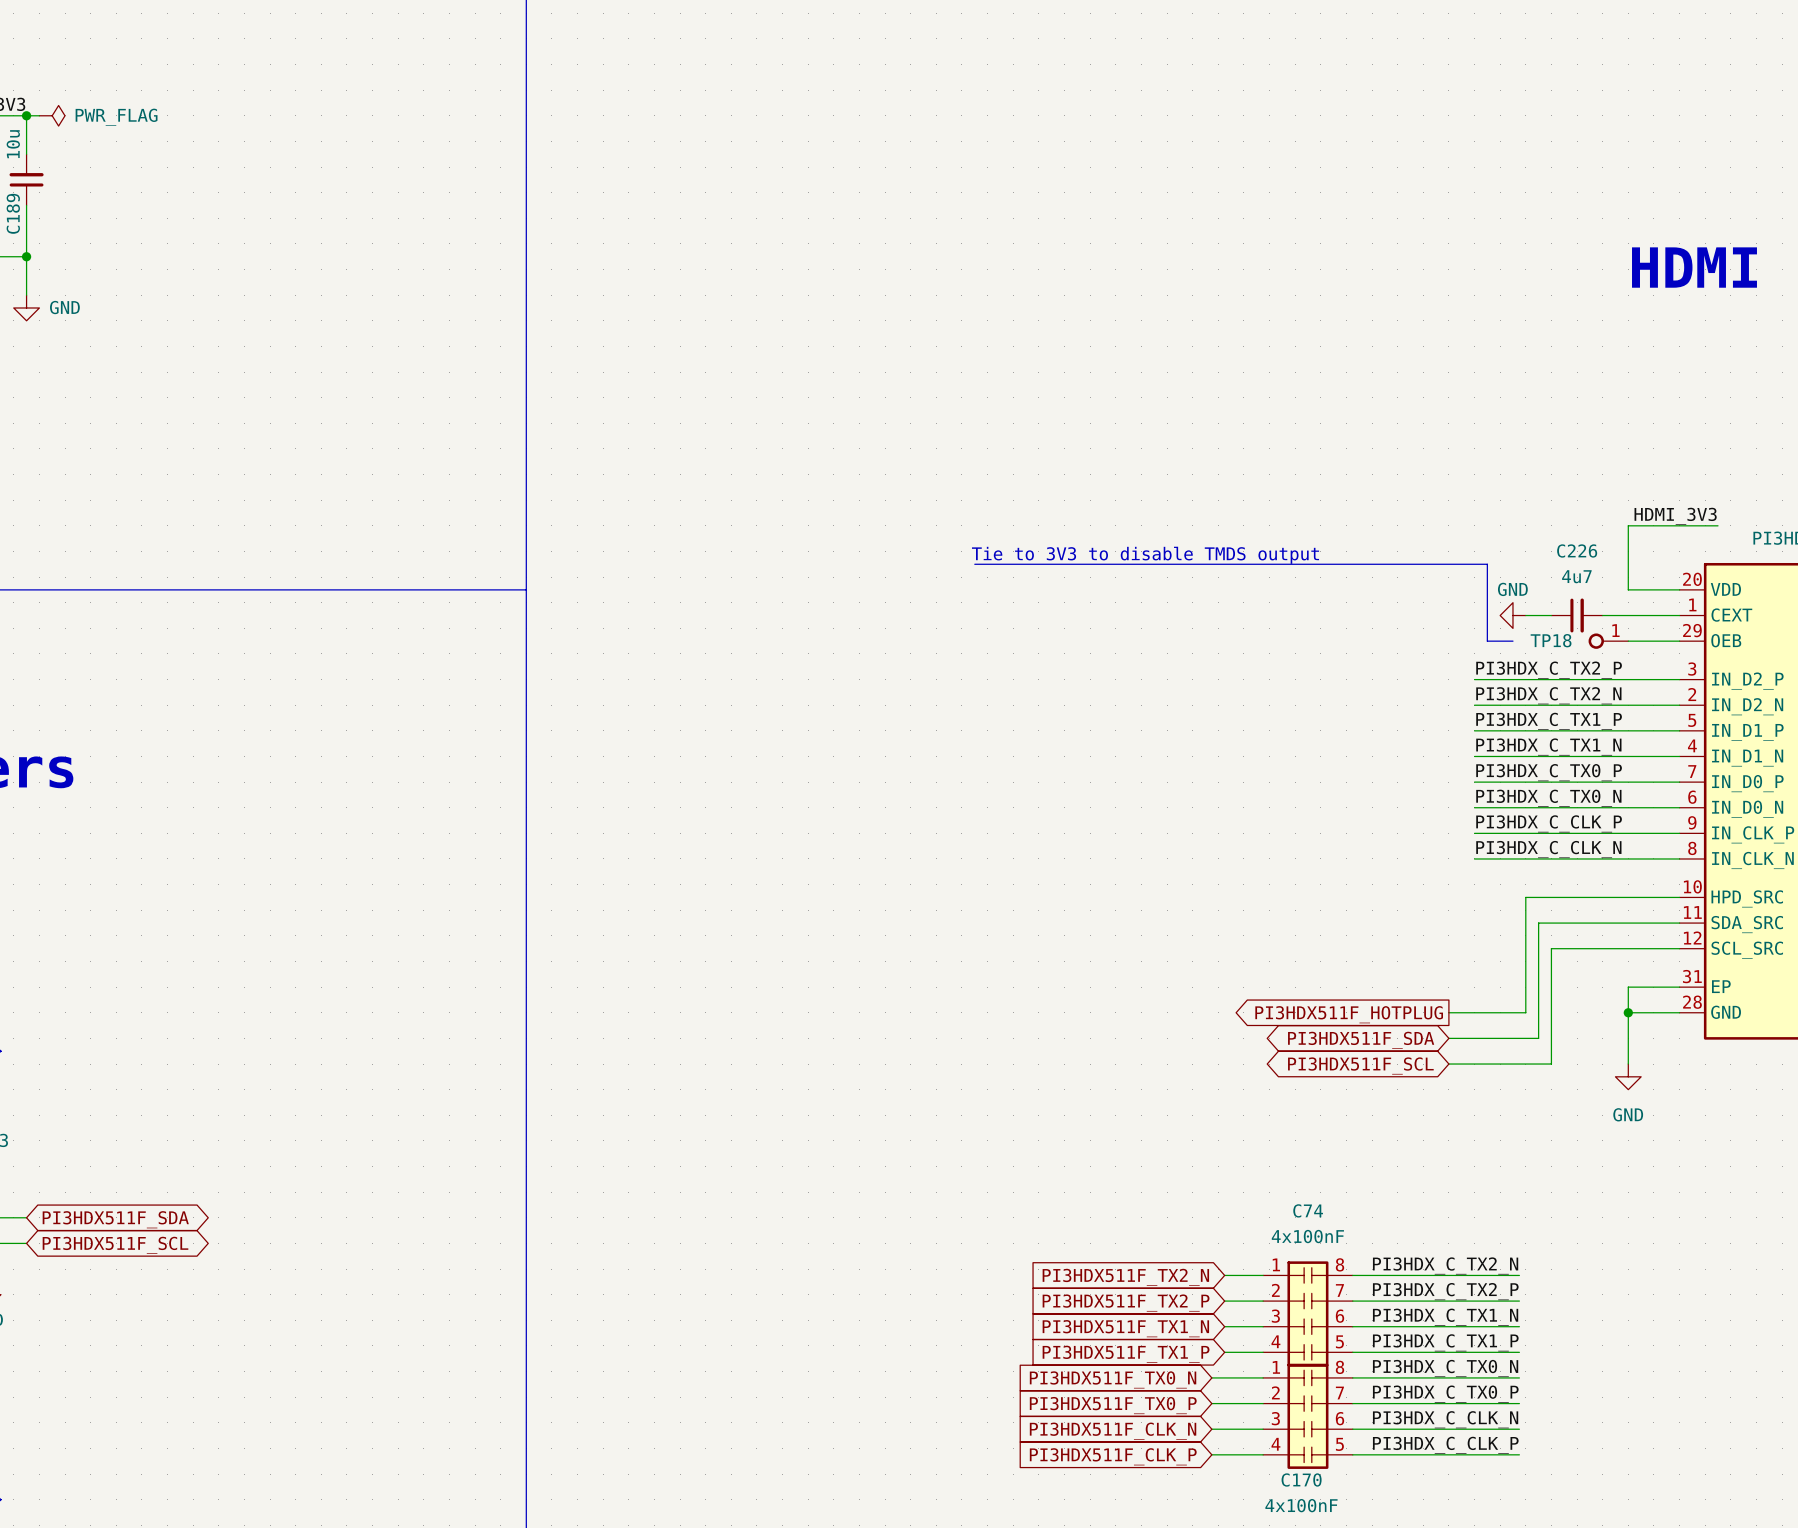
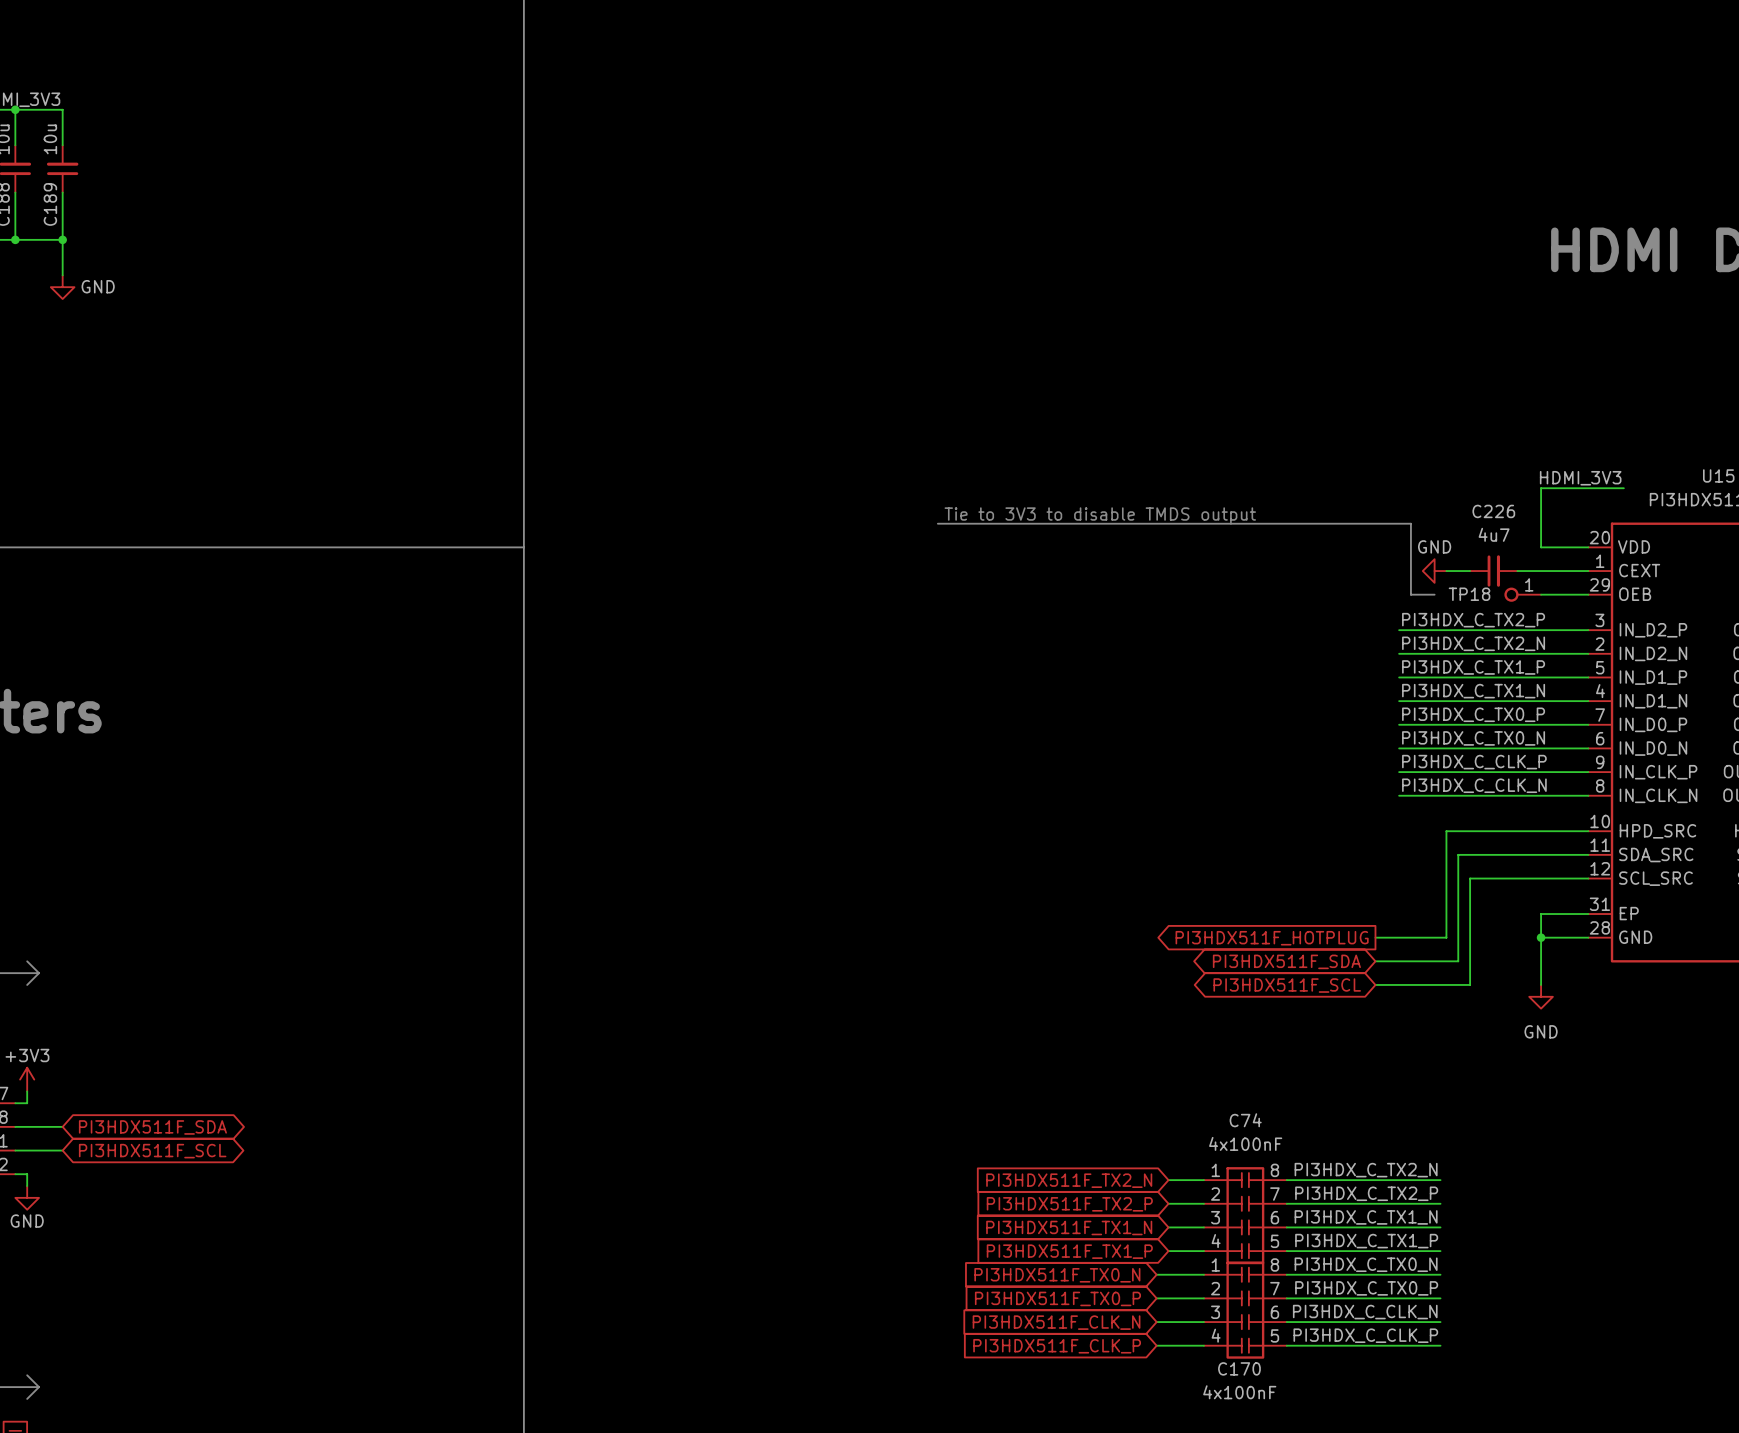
wire: (26, 115) (39, 115) -> none
junction: (26, 115) -> none
power symbol: PWR_FLAG (52, 115) -> none

